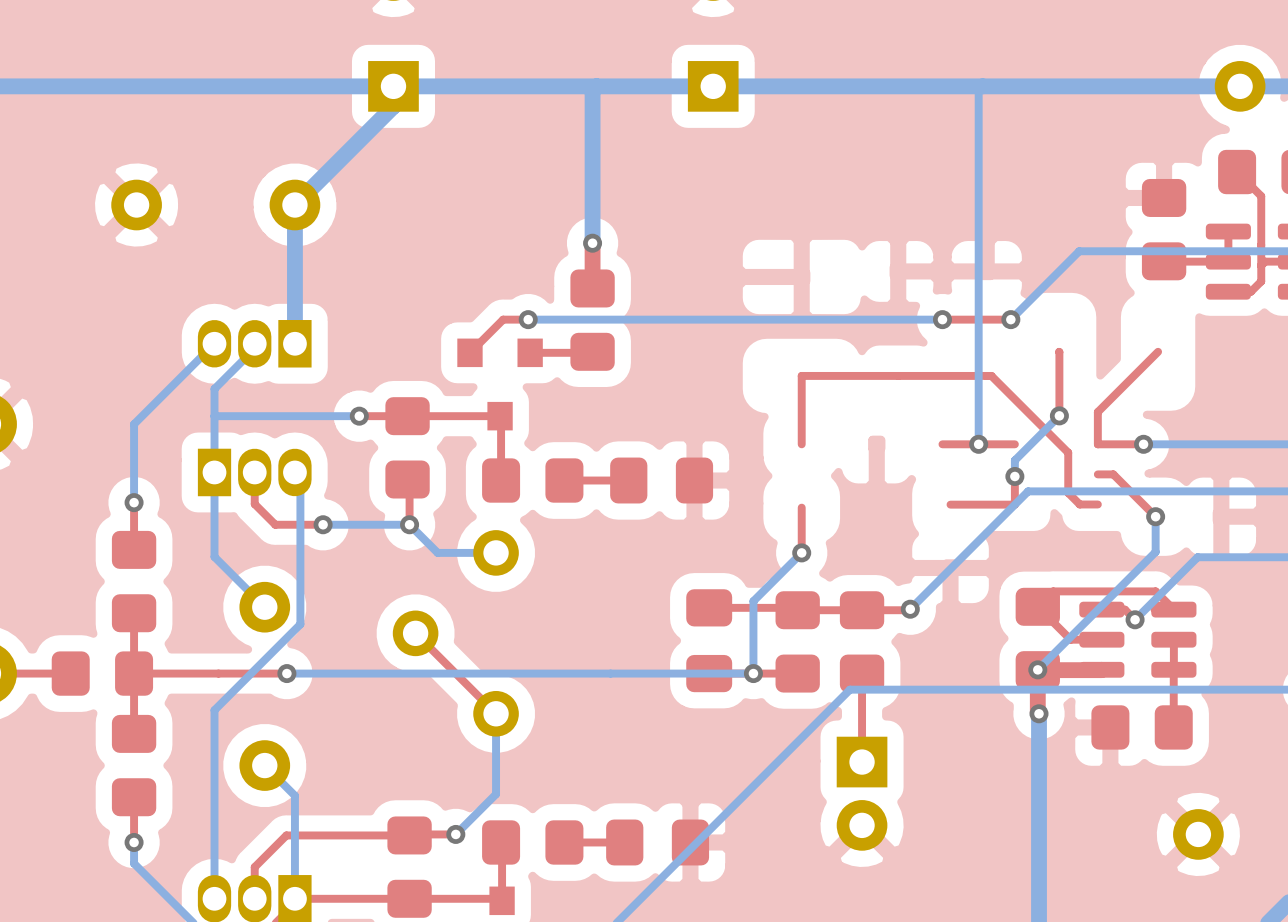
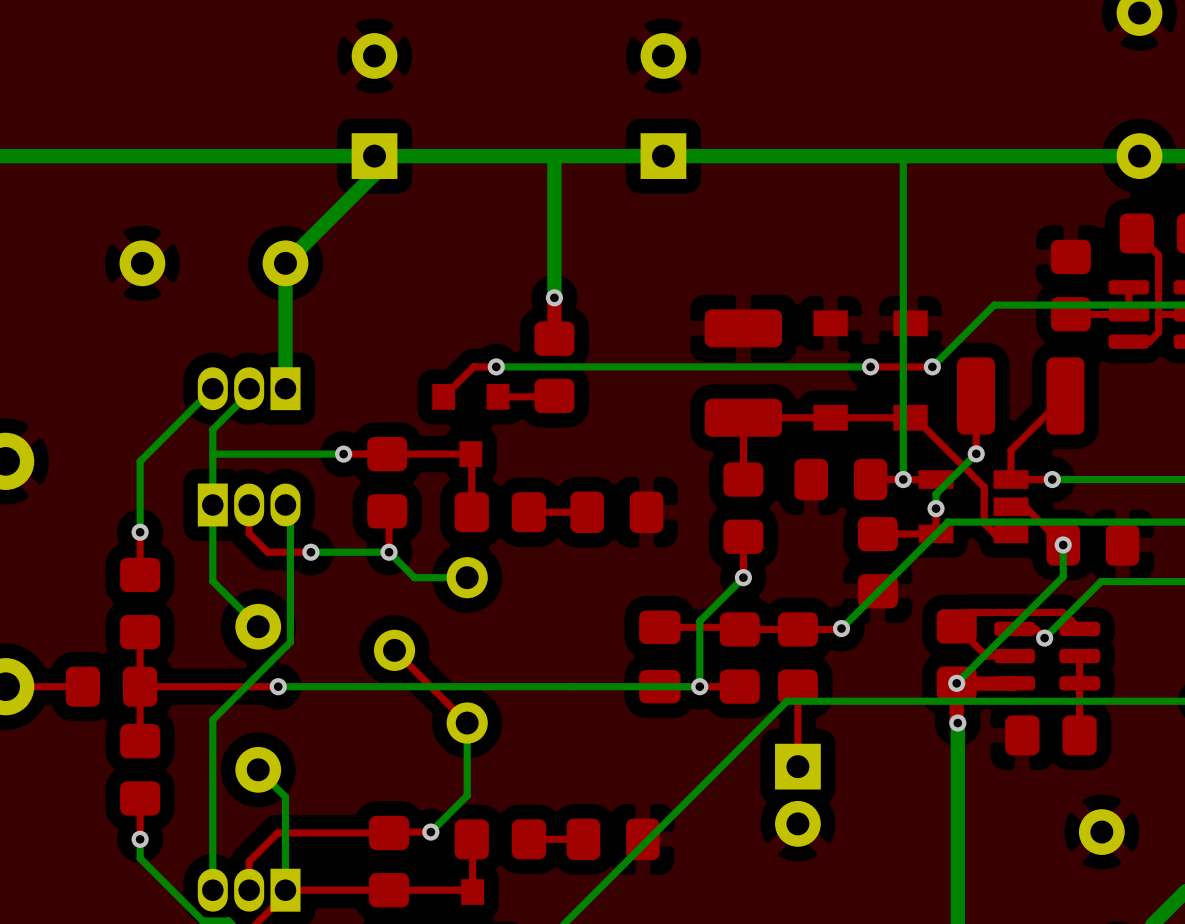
part: none -> (830, 370)
part: none -> (910, 370)
part: none -> (743, 373)
part: none -> (1020, 395)
part: none -> (840, 479)
part: none -> (973, 506)
part: none -> (743, 508)
part: none -> (1092, 544)
part: none -> (877, 562)

